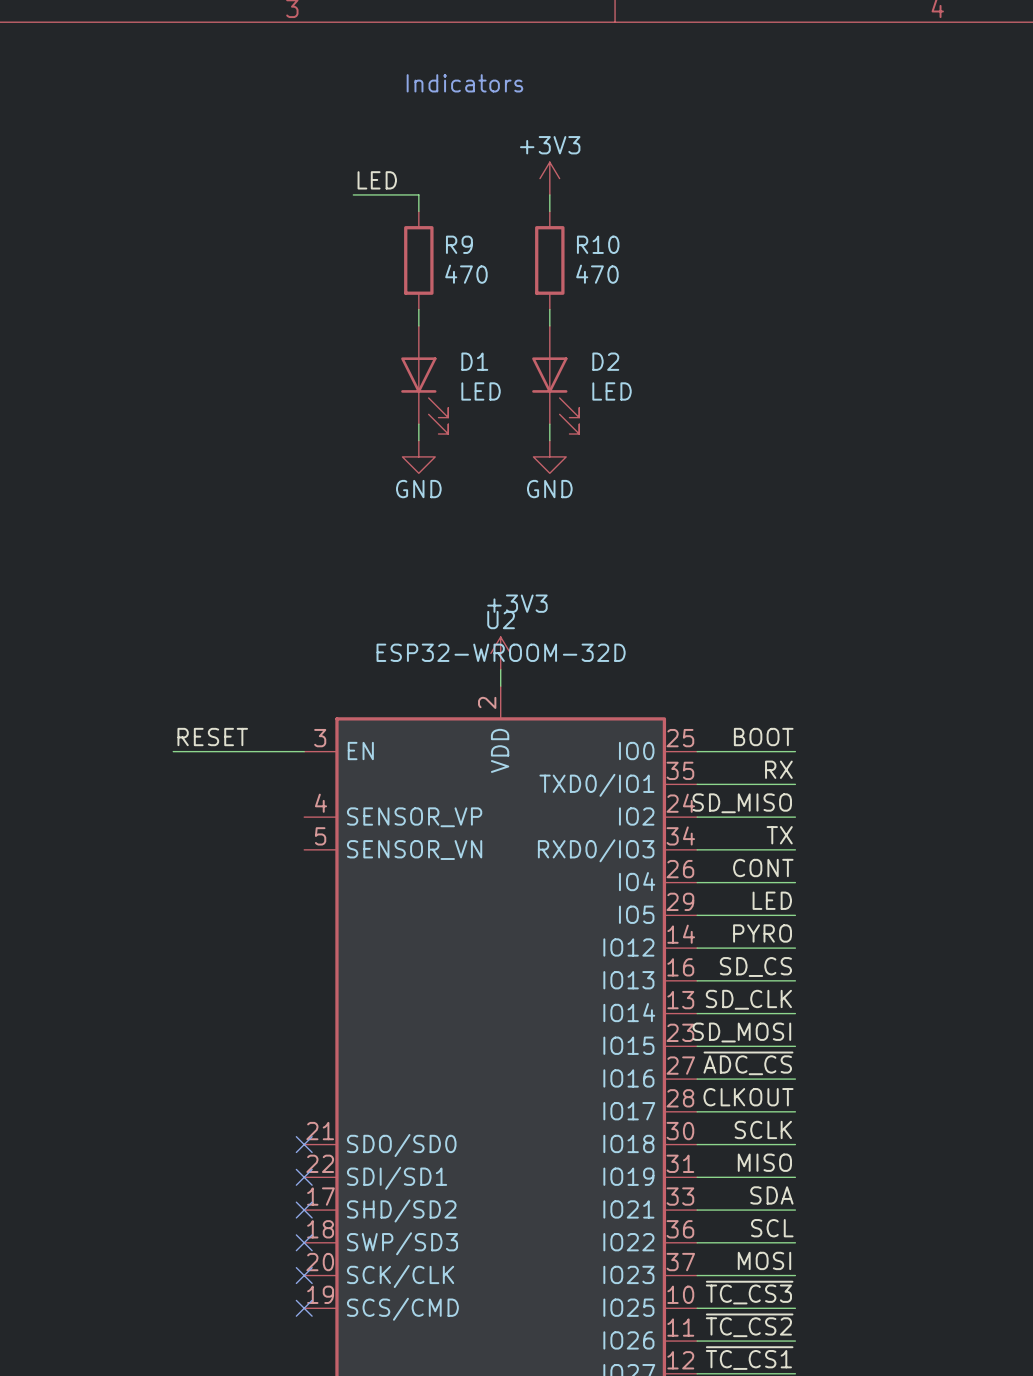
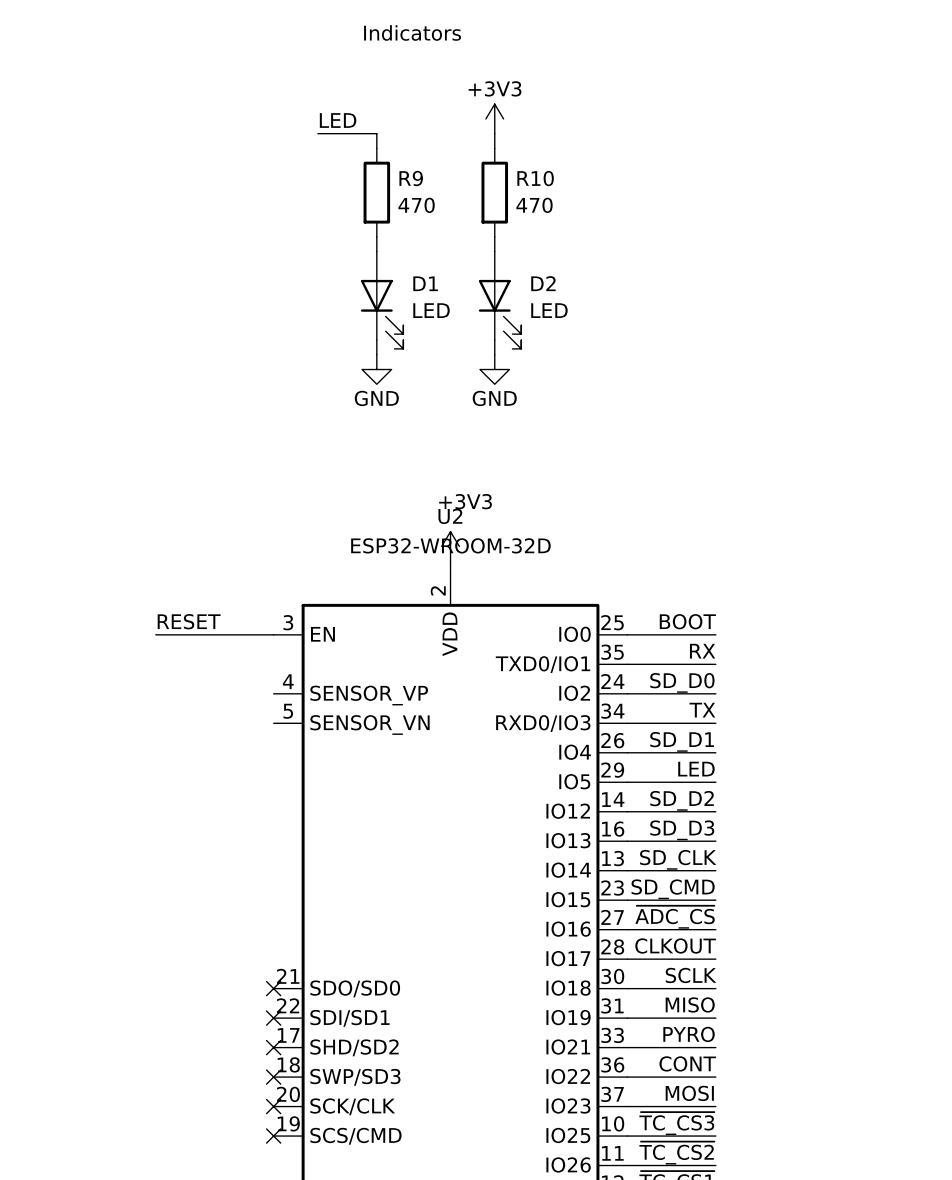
label: SD_MISO (742, 803) -> SD_D0 (682, 682)
label: CONT (763, 868) -> SD_D1 (682, 741)
label: PYRO (762, 933) -> SD_D2 (682, 800)
label: SD_CS (755, 967) -> SD_D3 (682, 830)
label: SD_MOSI (741, 1032) -> SD_CMD (673, 889)
label: SDA (771, 1195) -> PYRO (689, 1034)
label: SCL (772, 1228) -> CONT (687, 1063)

